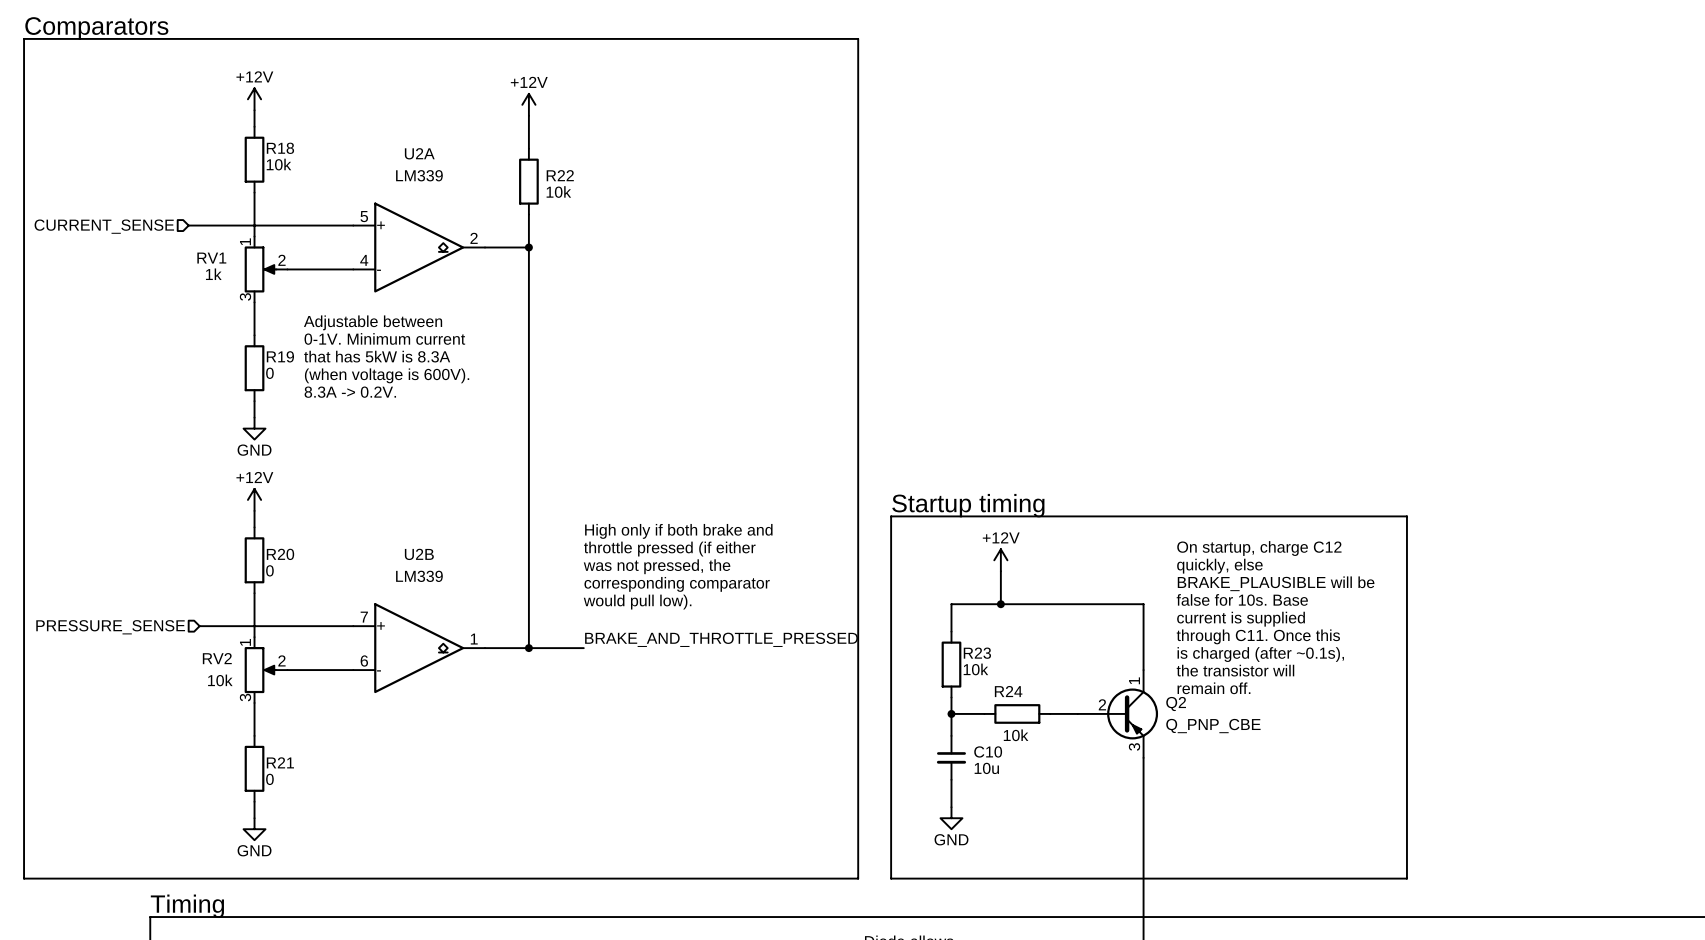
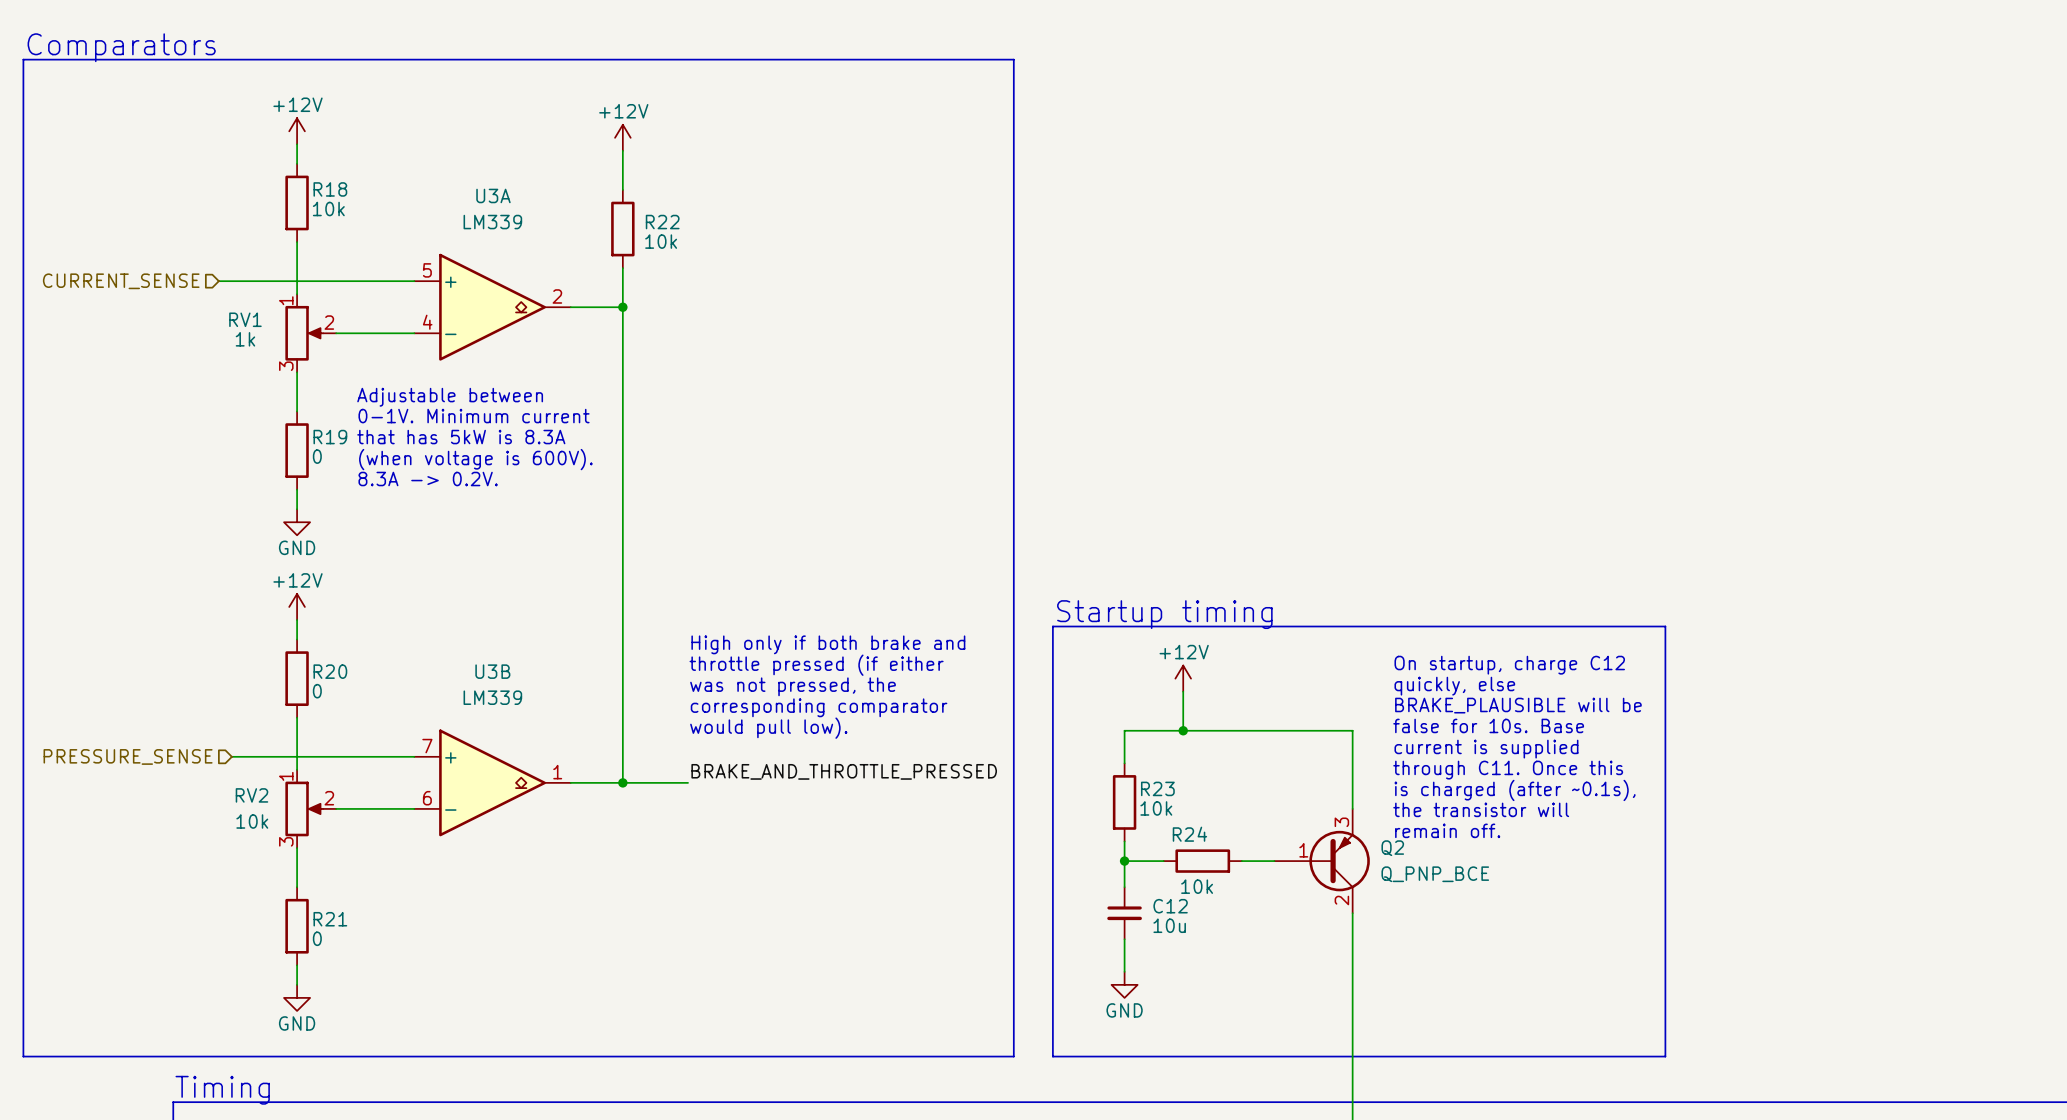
U2A name: U2A (419, 153) -> U3A (493, 195)
U2B name: U2B (419, 554) -> U3B (492, 671)
Q2 symbol: [1077, 670, 1159, 758] -> [1274, 808, 1370, 914]
Q2 value: Q_PNP_CBE (1213, 726) -> Q_PNP_BCE (1435, 874)
C10 name: C10 (988, 751) -> C12 (1170, 906)

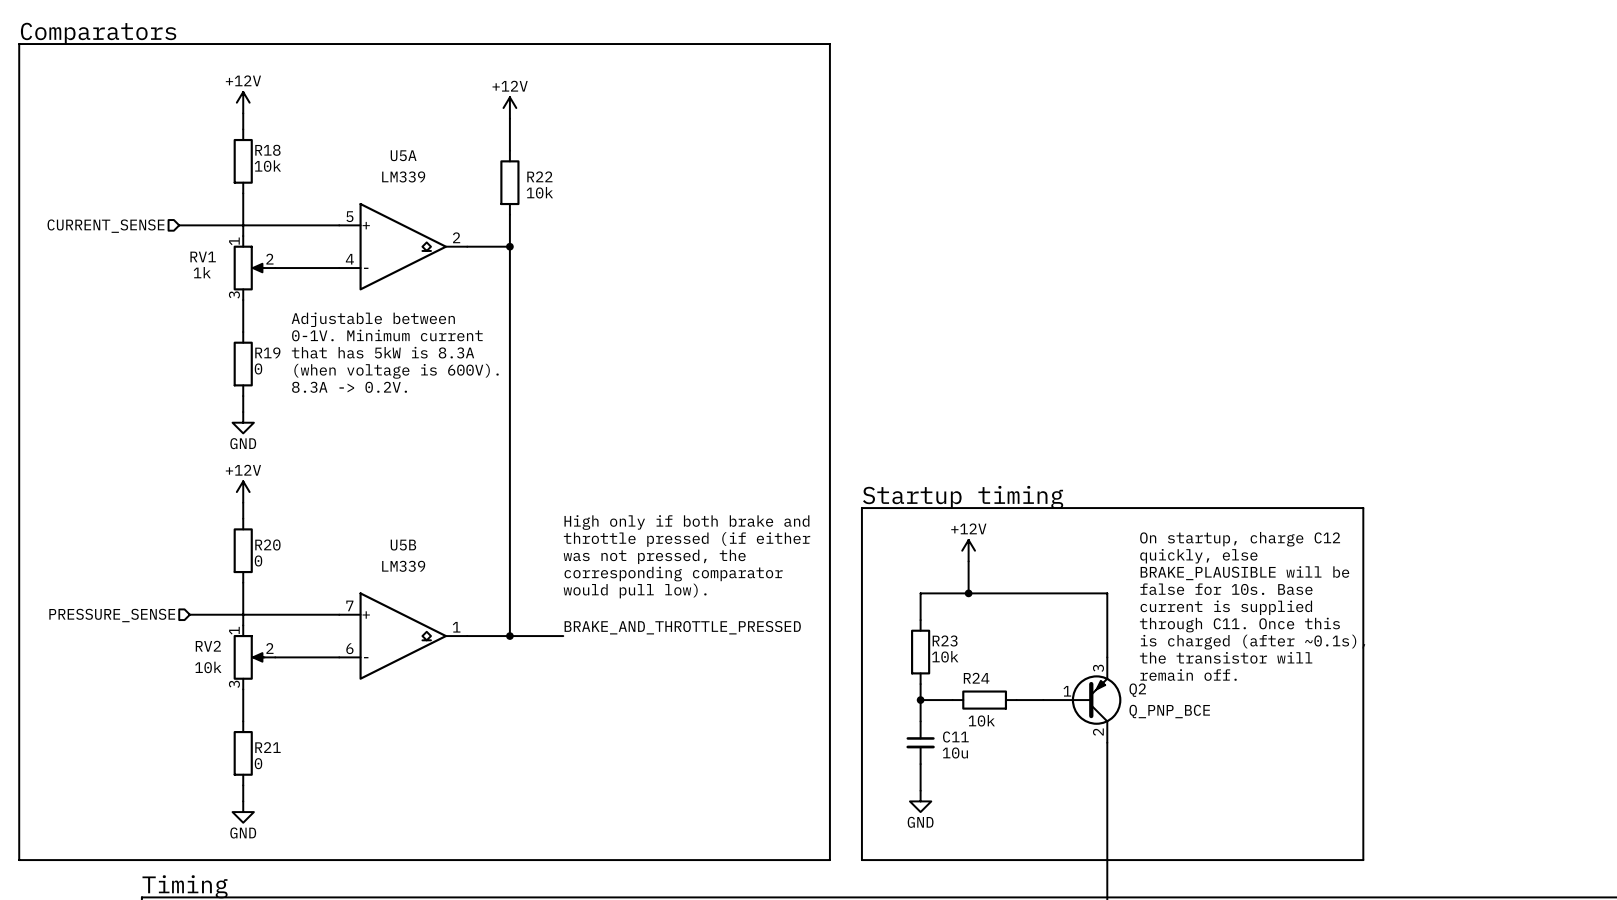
U3A name: U3A (493, 195) -> U5A (403, 155)
U3B name: U3B (492, 671) -> U5B (403, 545)
C12 name: C12 (1170, 906) -> C11 (955, 737)

